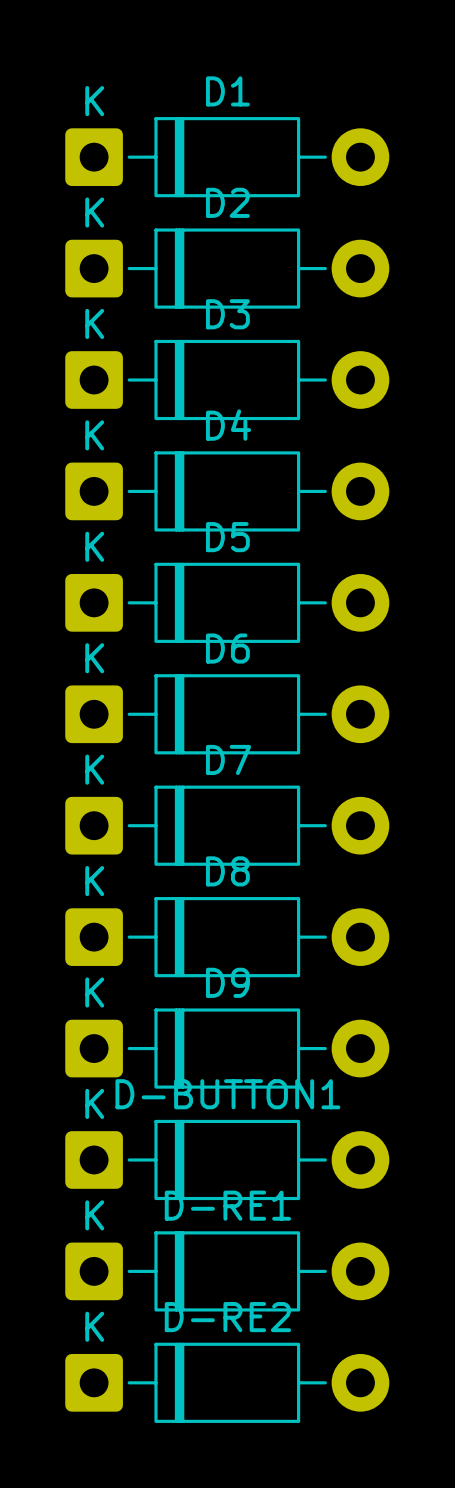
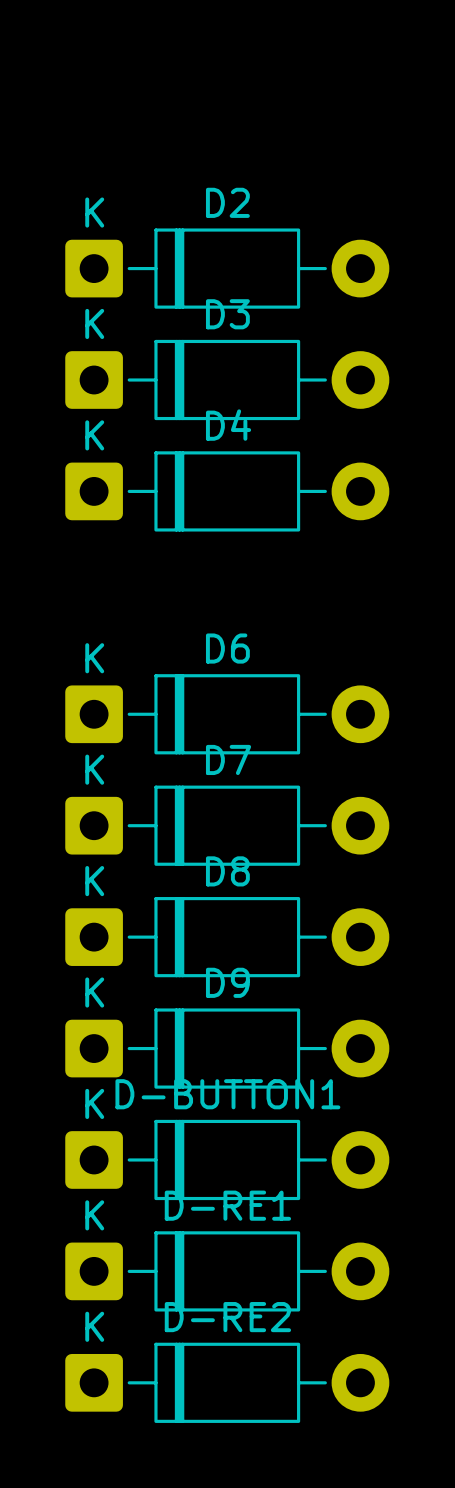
D1: (227, 157) -> none
D5: (227, 602) -> none

